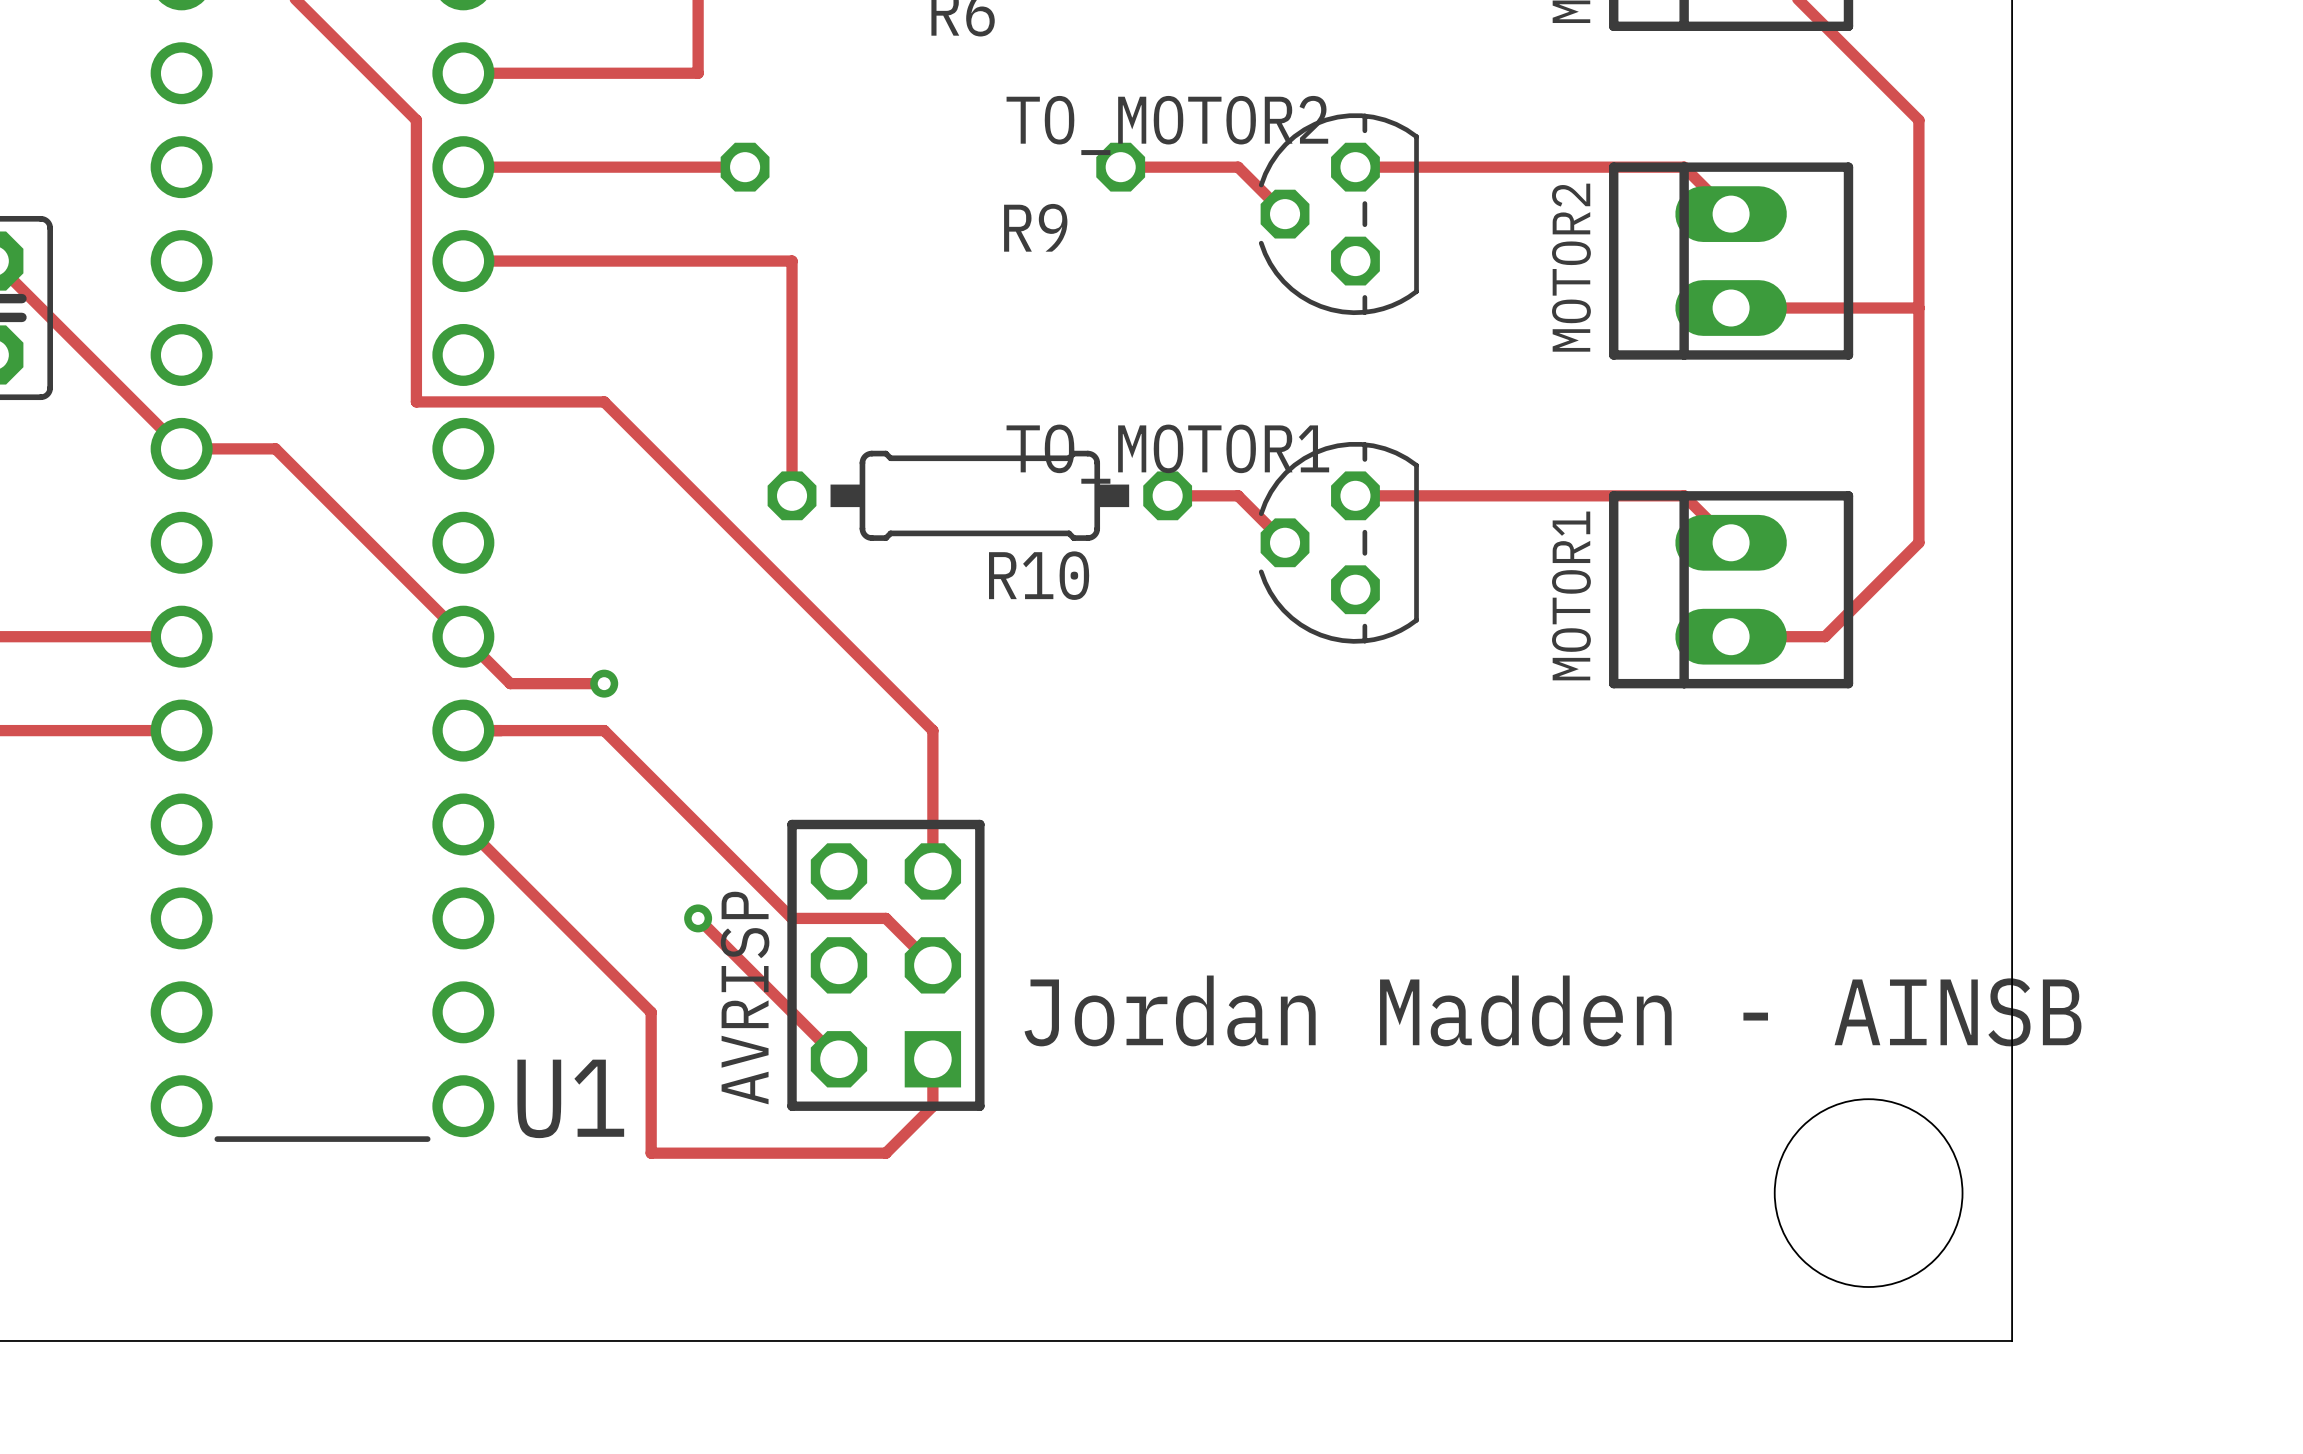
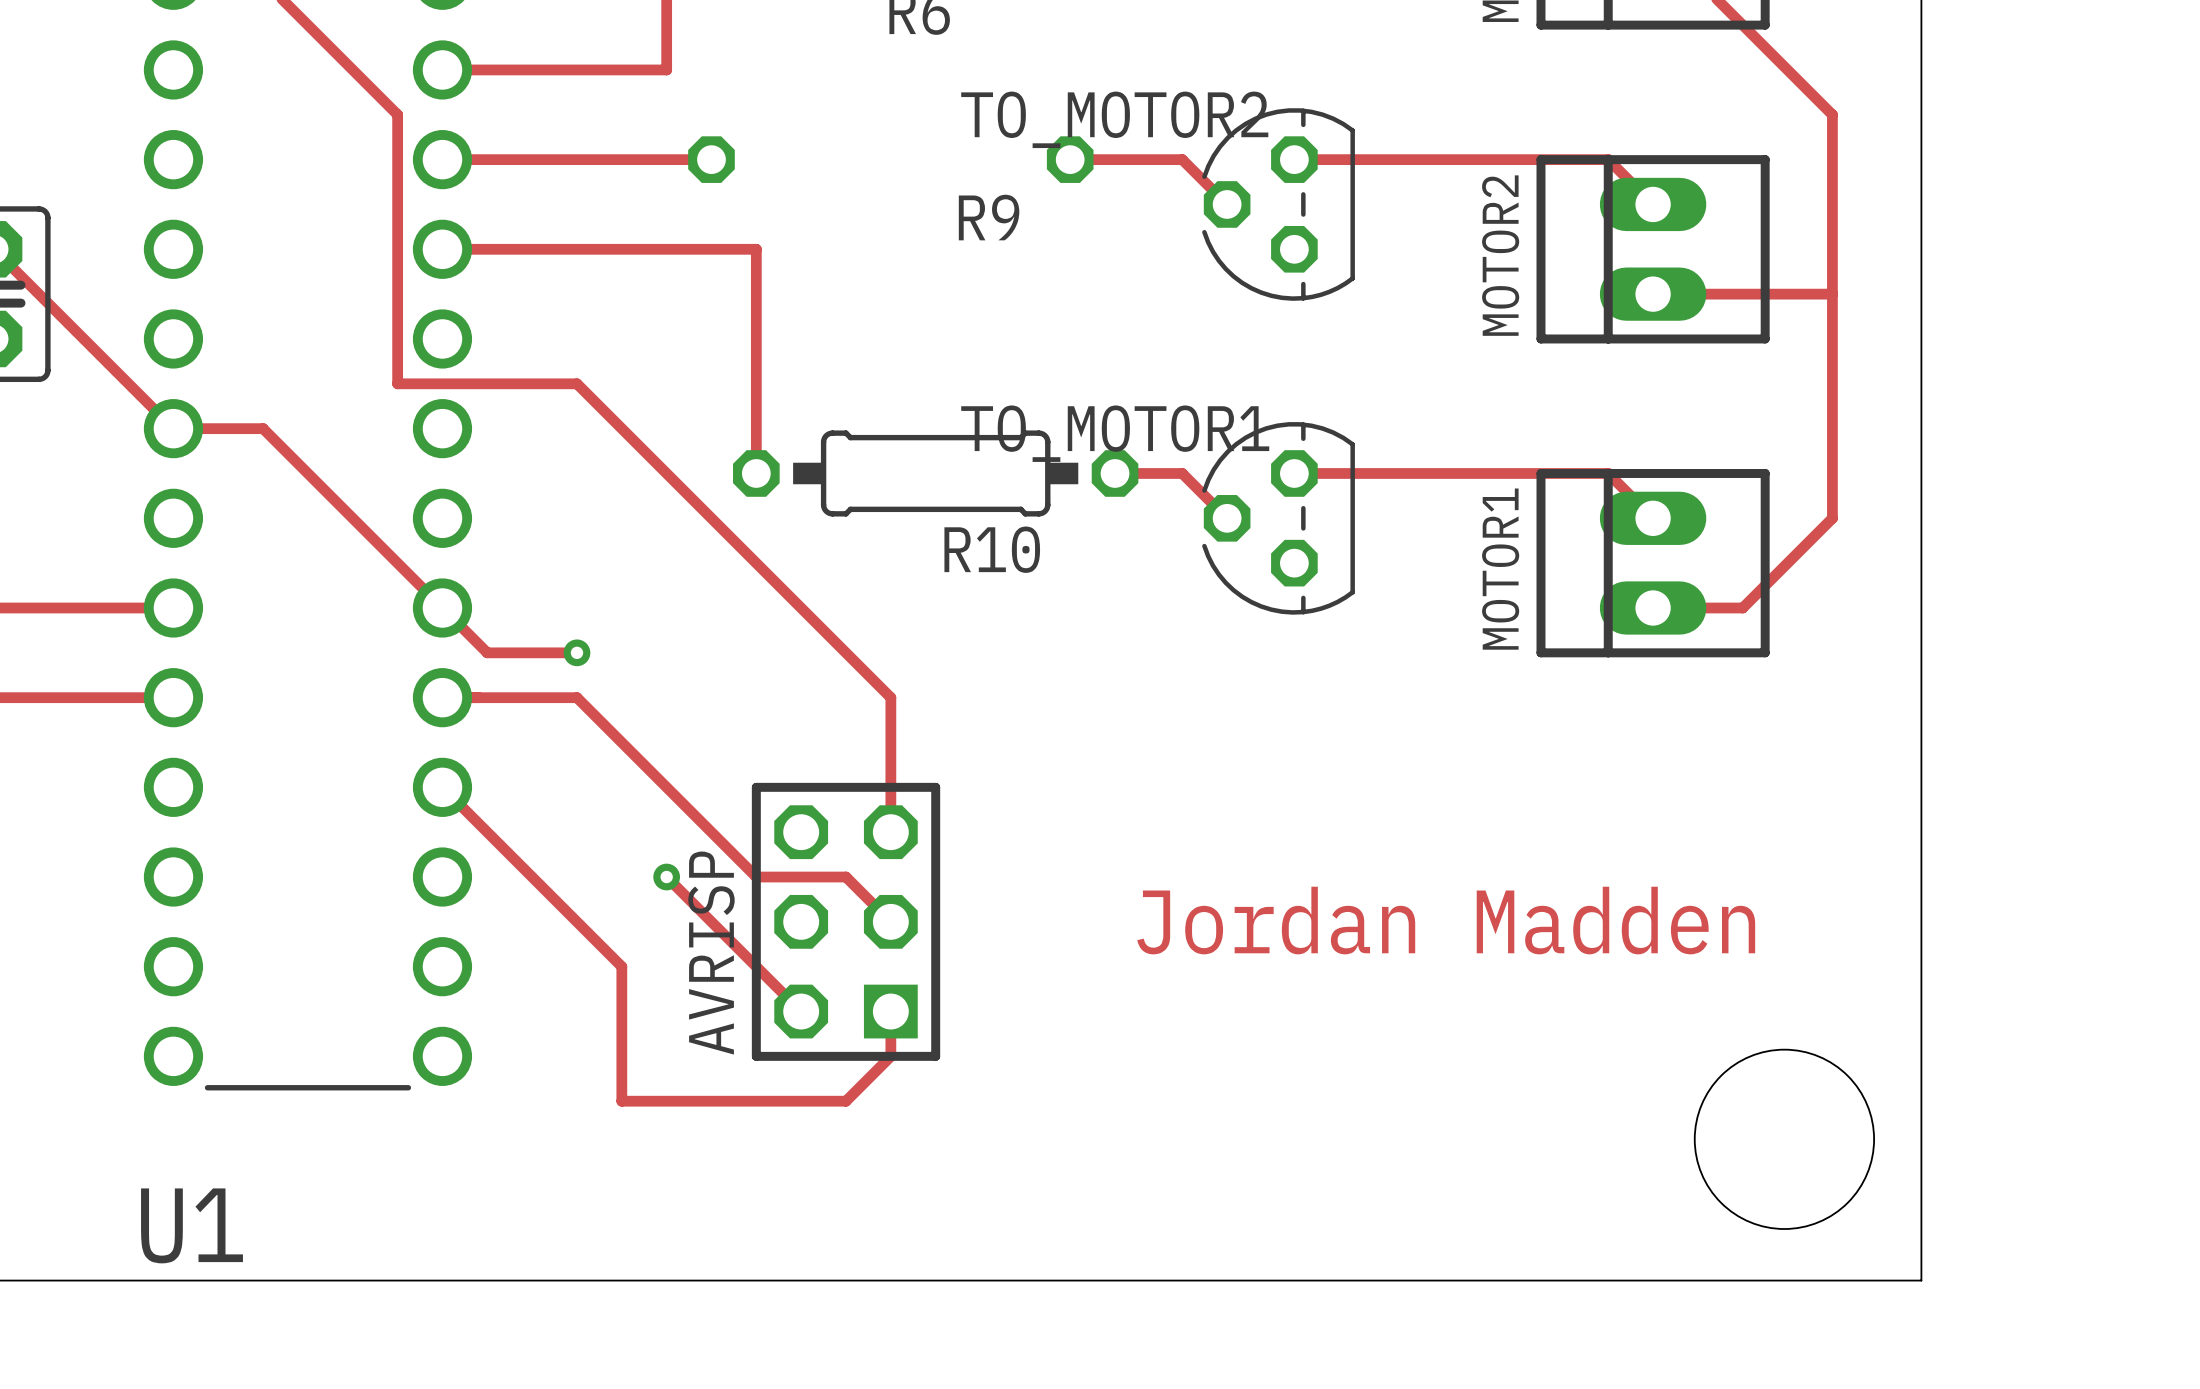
text: Jordan Madden - AINSB (1553, 1010) -> Jordan Madden (1446, 920)
U1 name position: U1 (570, 1098) -> U1 (192, 1225)

